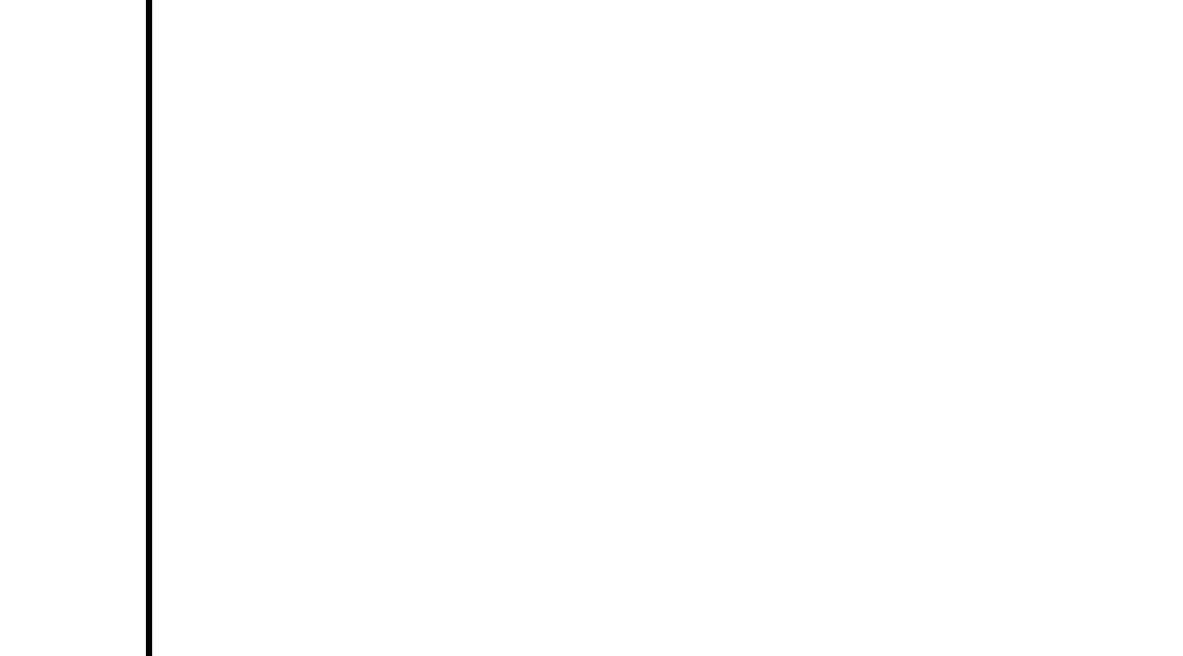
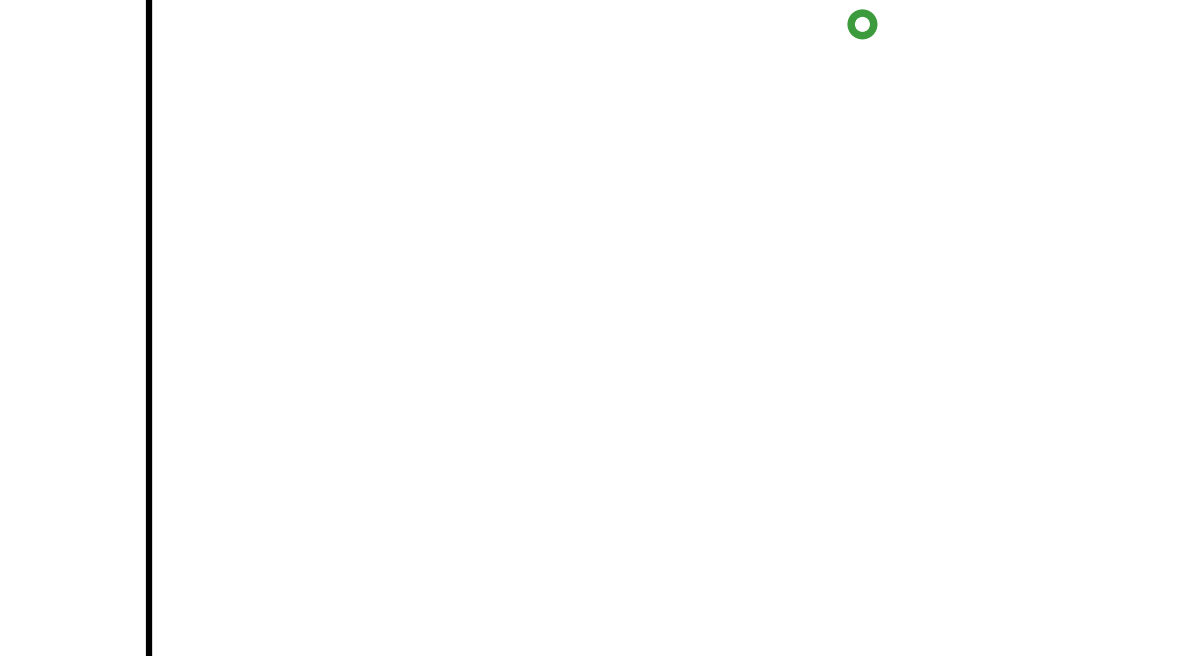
via: none -> (862, 24)

